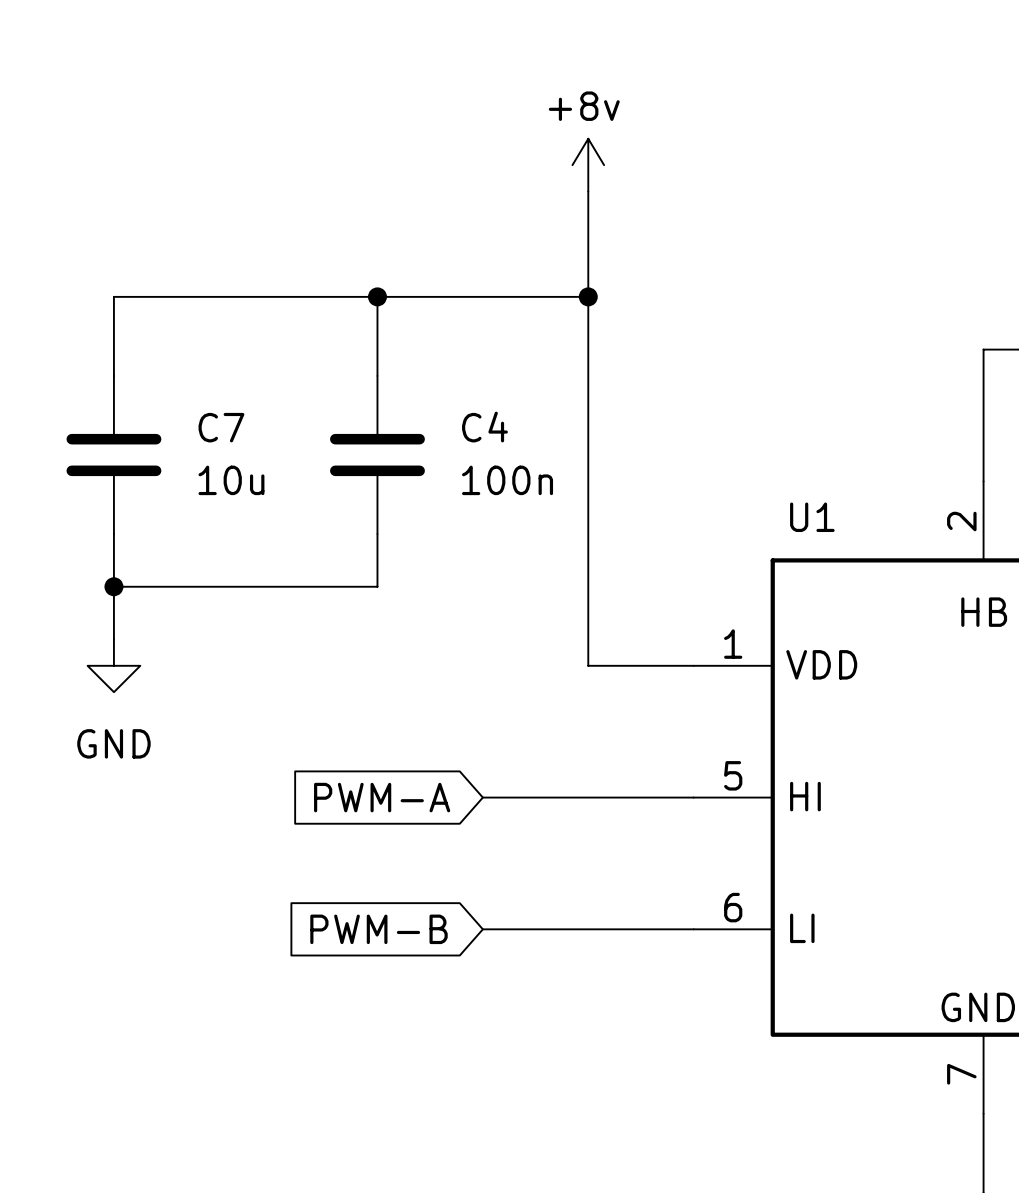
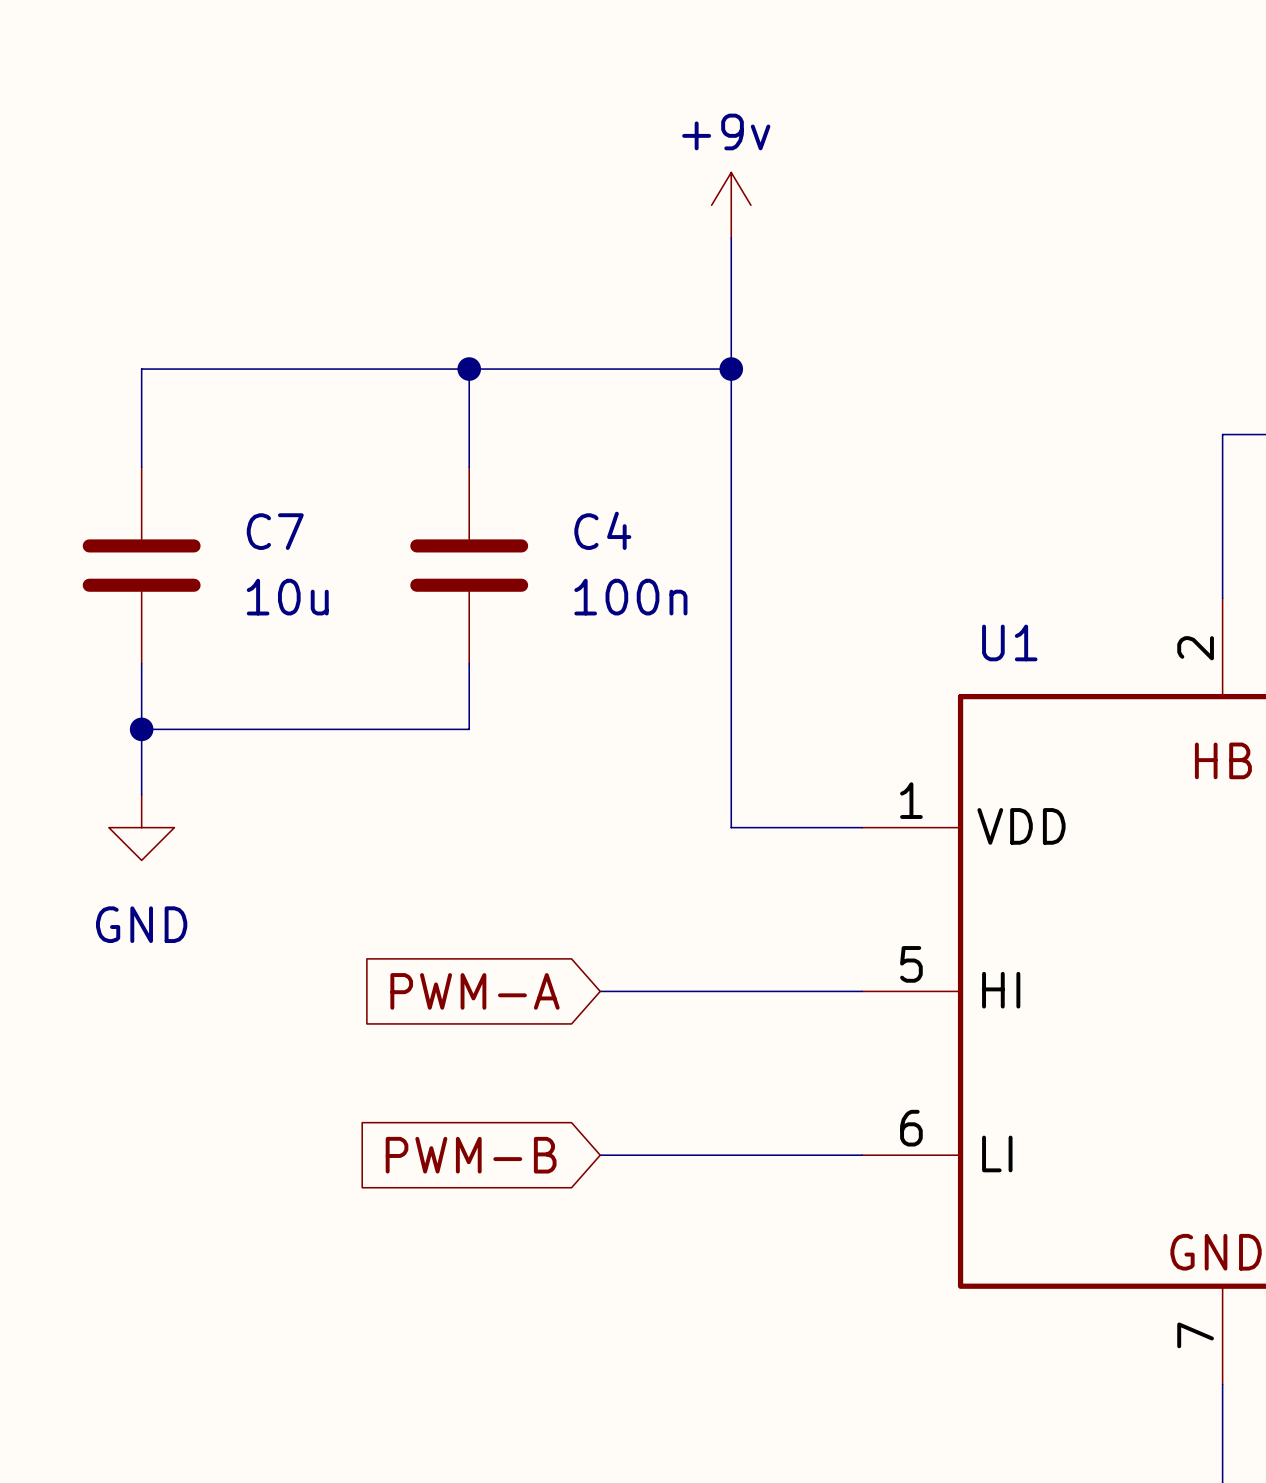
power symbol: +8v (588, 165) -> +9v (731, 205)

